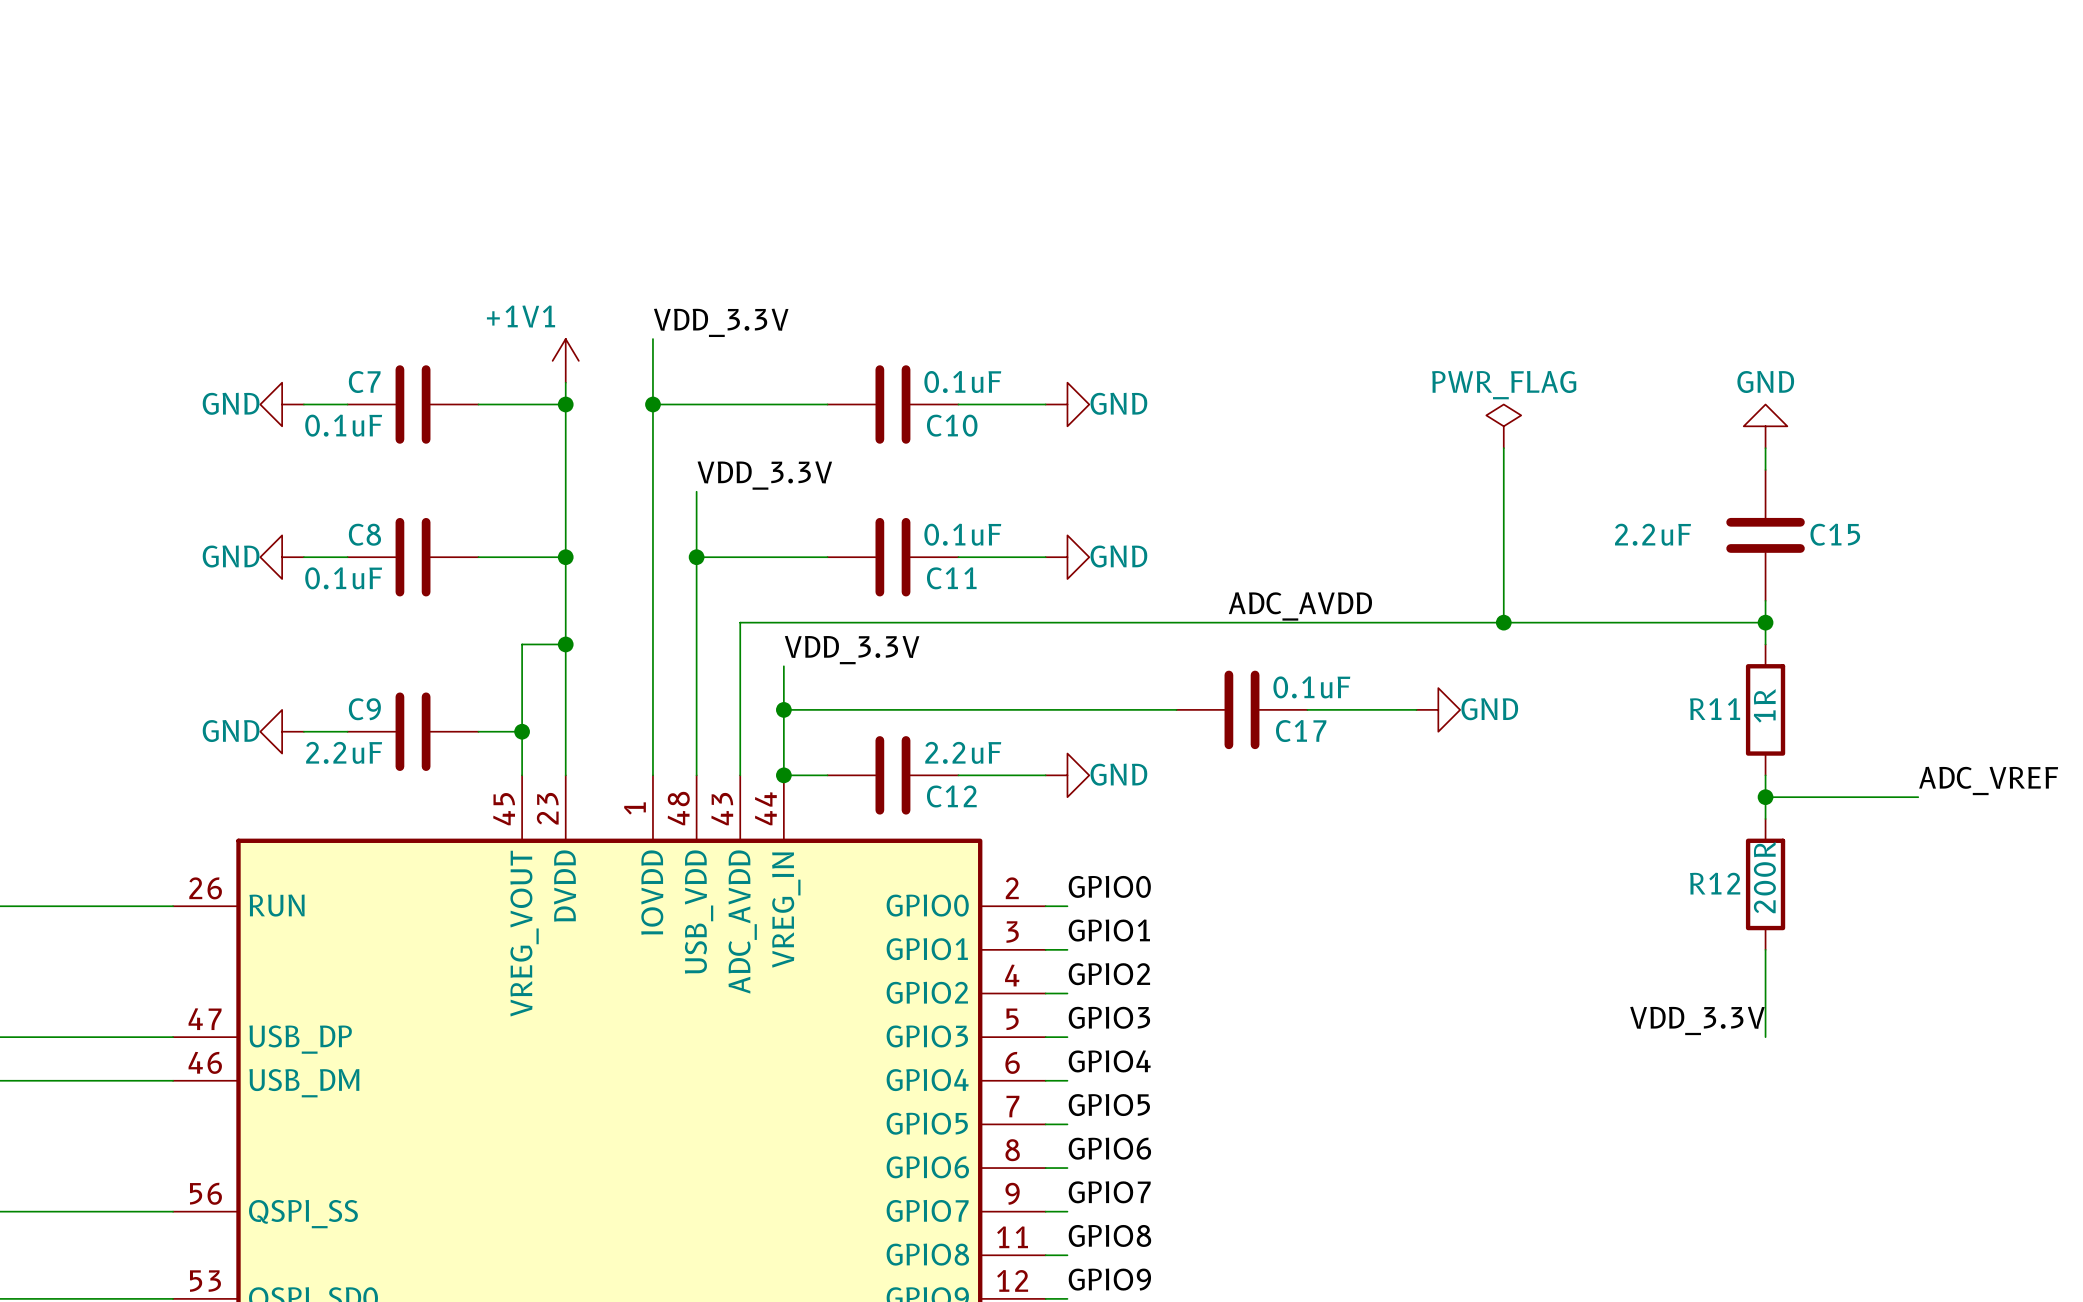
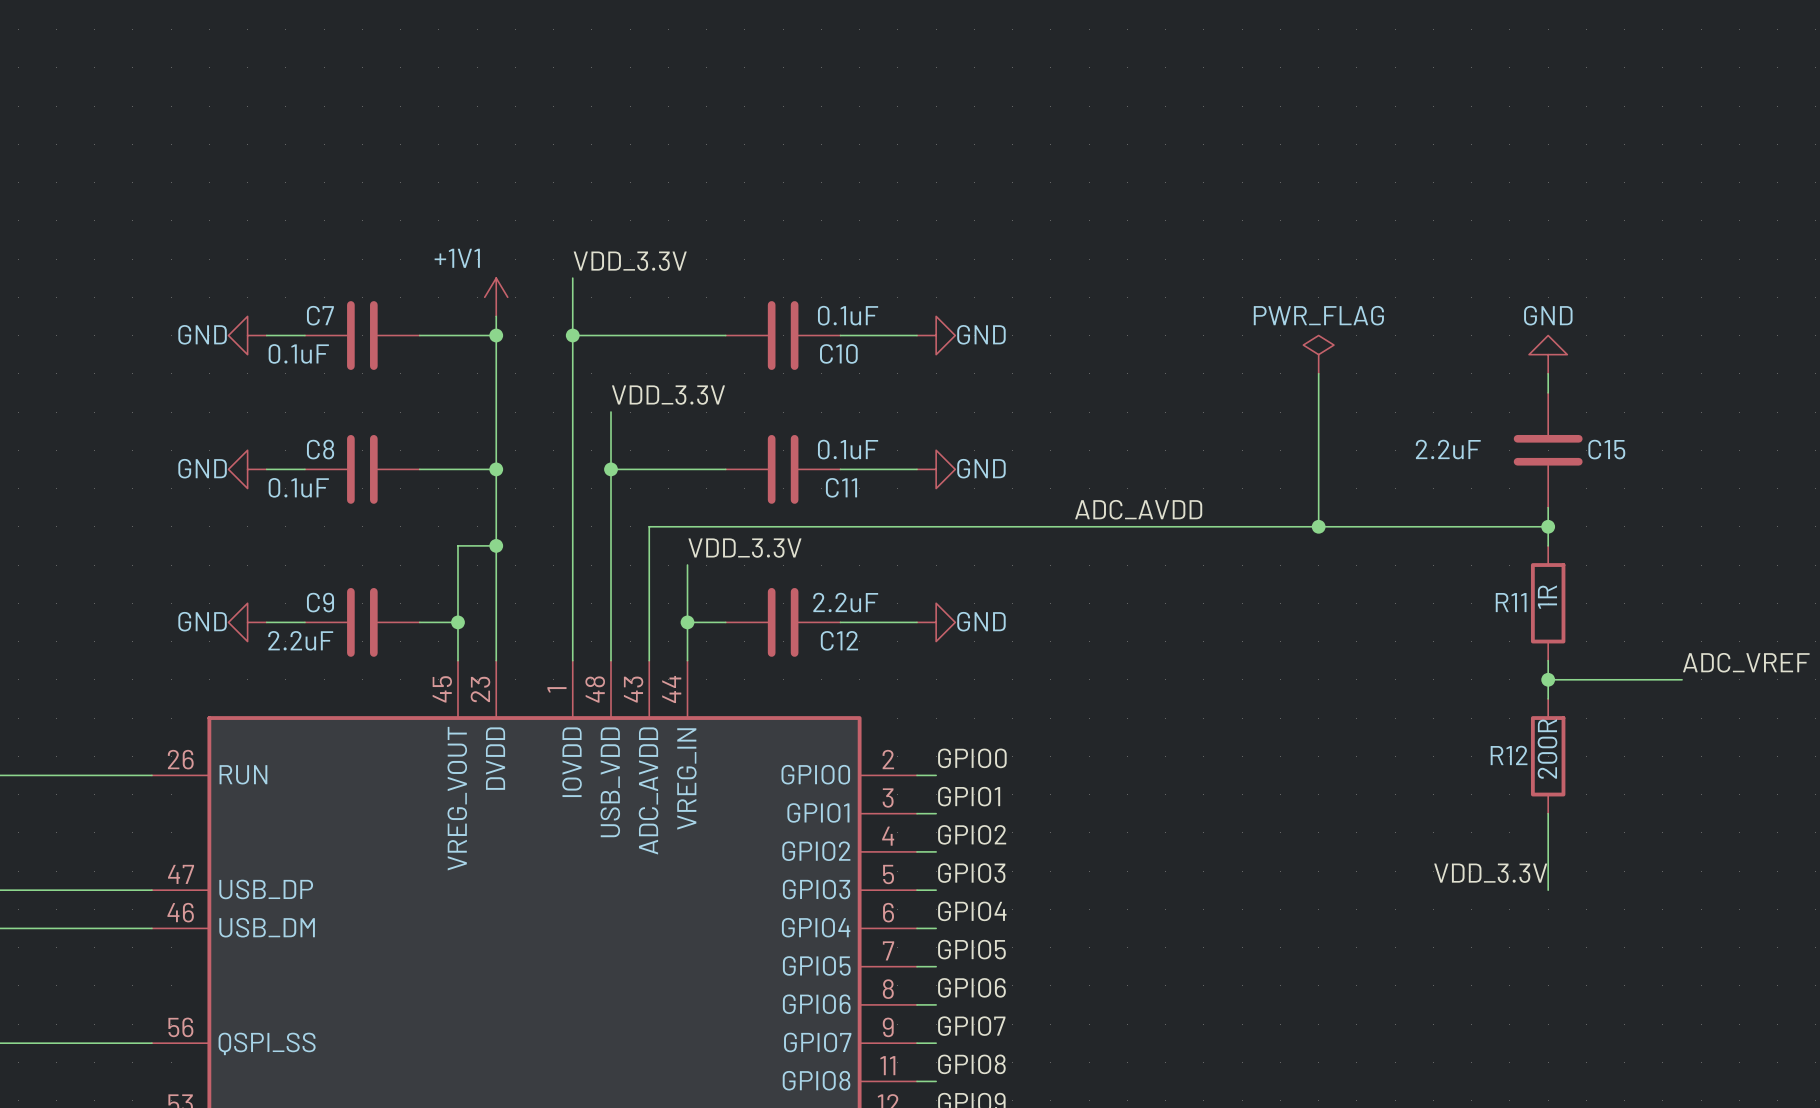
wire: (783, 709) (1176, 709) -> none
junction: (783, 709) -> none
C17: 0.1uF (1241, 709) -> none
wire: (1307, 709) (1416, 709) -> none
power symbol: GND (1438, 709) -> none
junction: none -> (687, 622)
wire: (783, 775) (827, 775) -> (687, 622) (725, 622)
junction: (783, 775) -> none
C12 position: (892, 775) -> (783, 622)
wire: (958, 775) (1045, 775) -> (840, 622) (917, 622)
power symbol position: GND (1067, 775) -> GND (936, 622)

